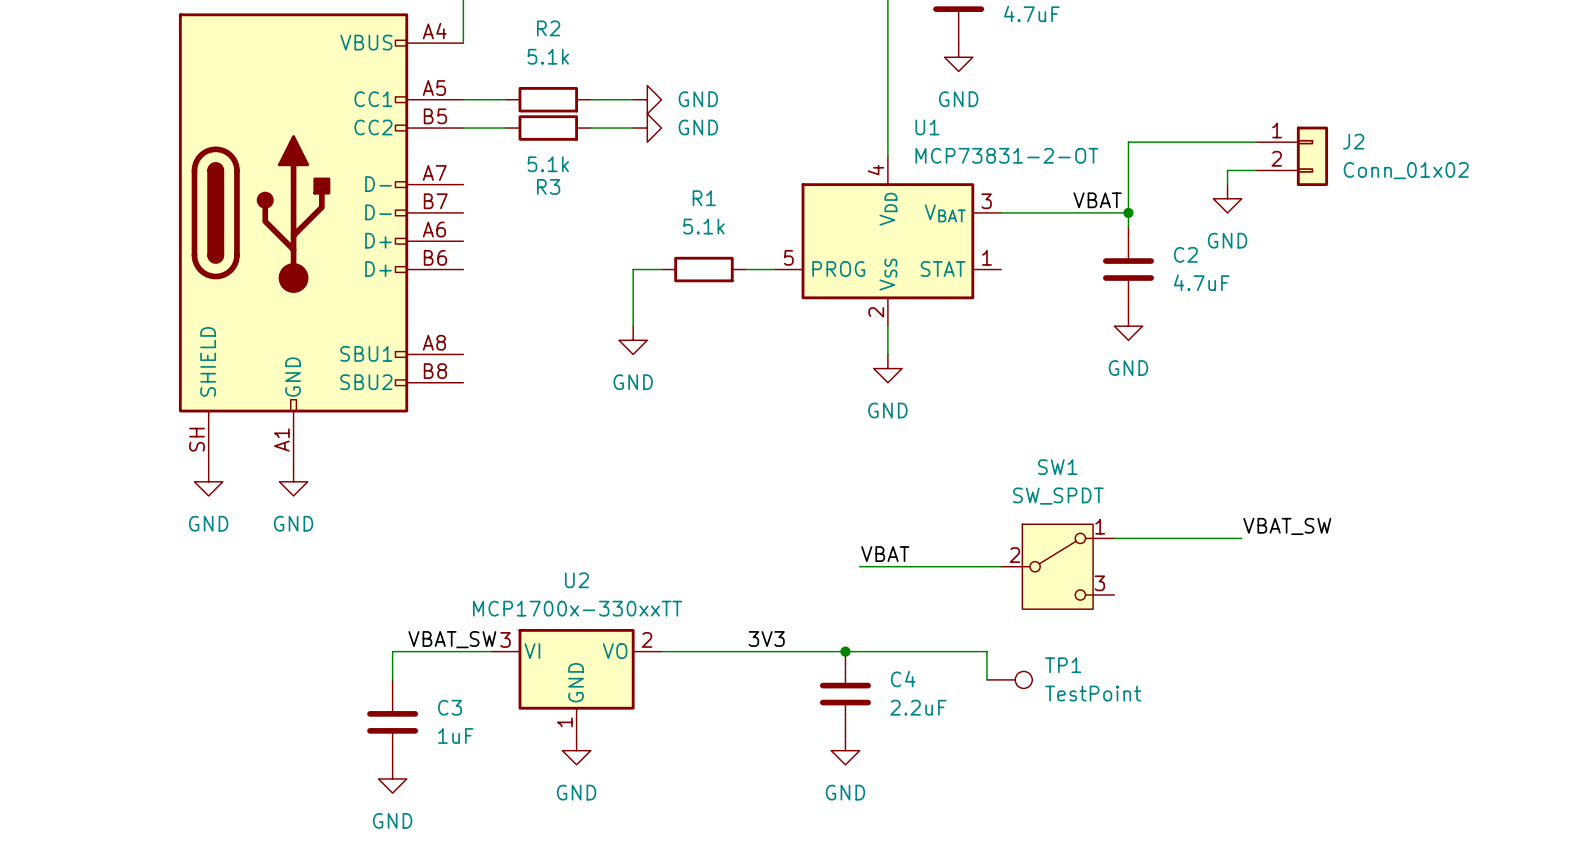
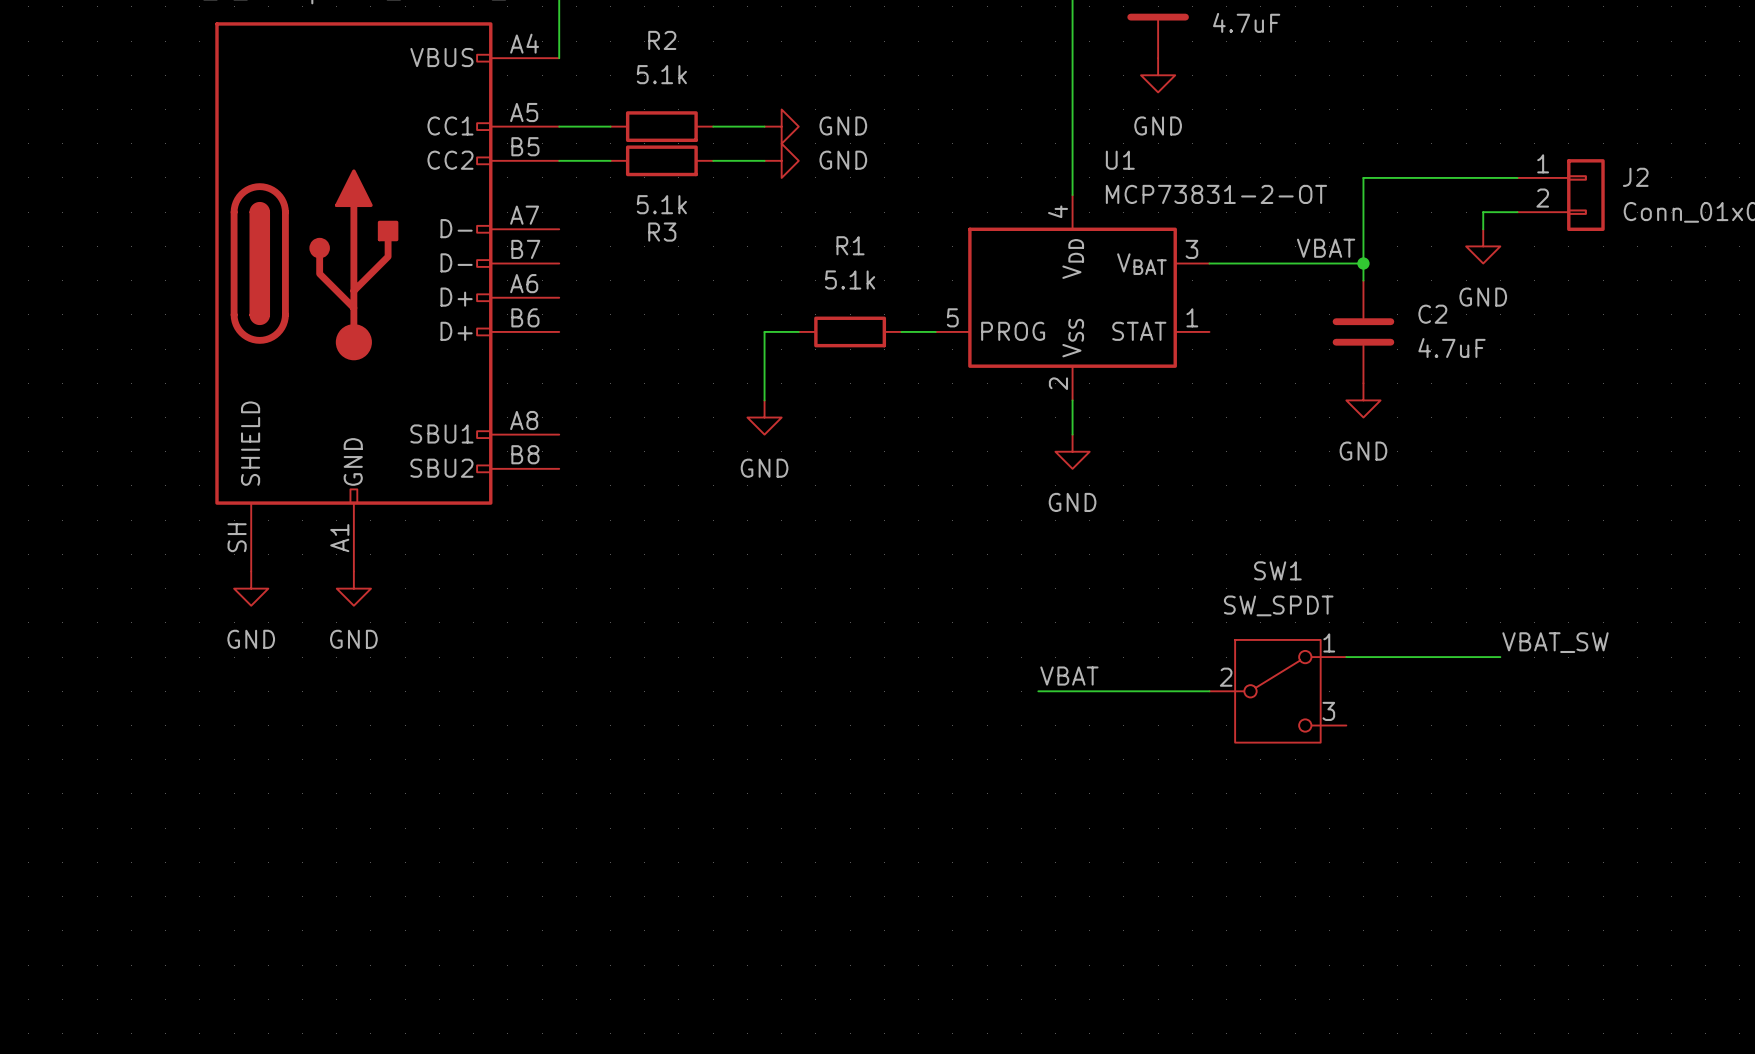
label: 3V3 (766, 638) -> none
label: VBAT_SW (452, 639) -> none
wire: (491, 651) (392, 651) (392, 679) -> none
wire: (661, 651) (986, 651) (986, 679) -> none
junction: (845, 651) -> none
TP1: TestPoint (1009, 679) -> none
U2: MCP1700x-330xxTT (576, 682) -> none
C4: 2.2uF (845, 694) -> none
C3: 1uF (392, 722) -> none
power symbol: GND (576, 750) -> none
power symbol: GND (845, 750) -> none
power symbol: GND (392, 778) -> none

